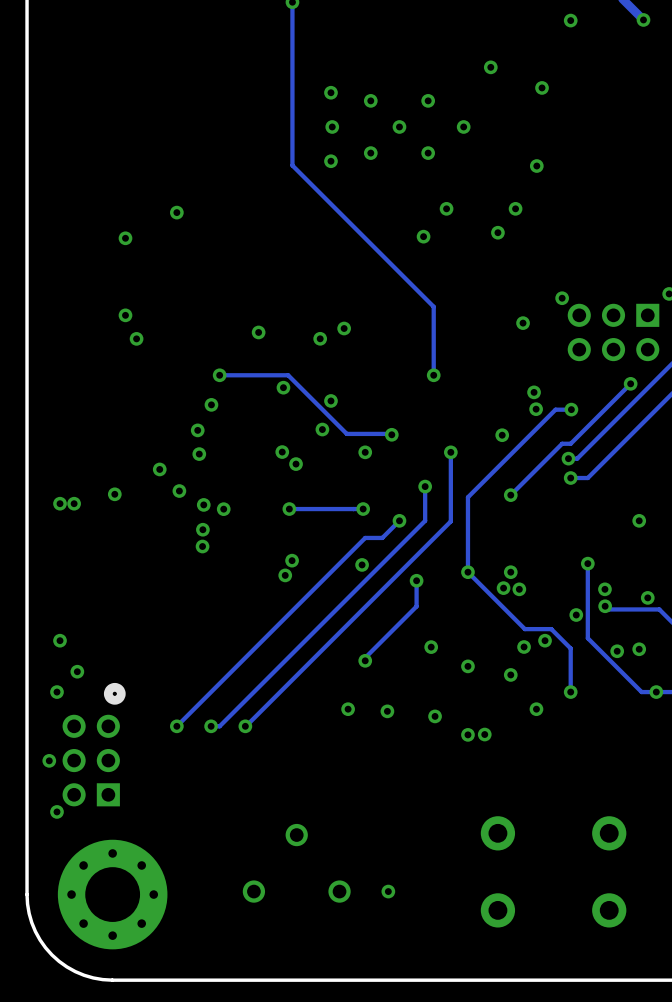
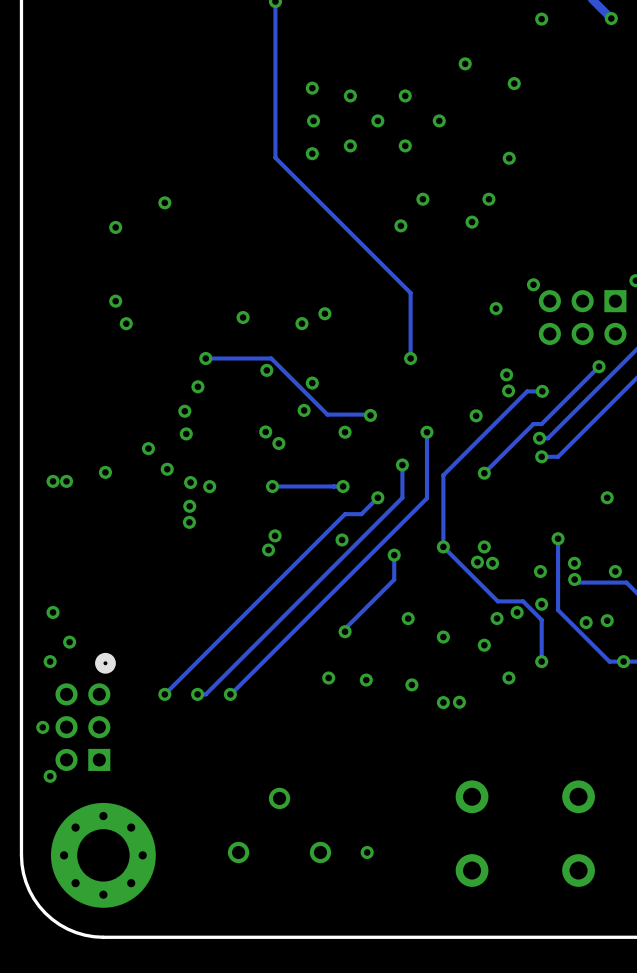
via: none -> (540, 571)
via: (576, 615) -> none
via: none -> (541, 604)

